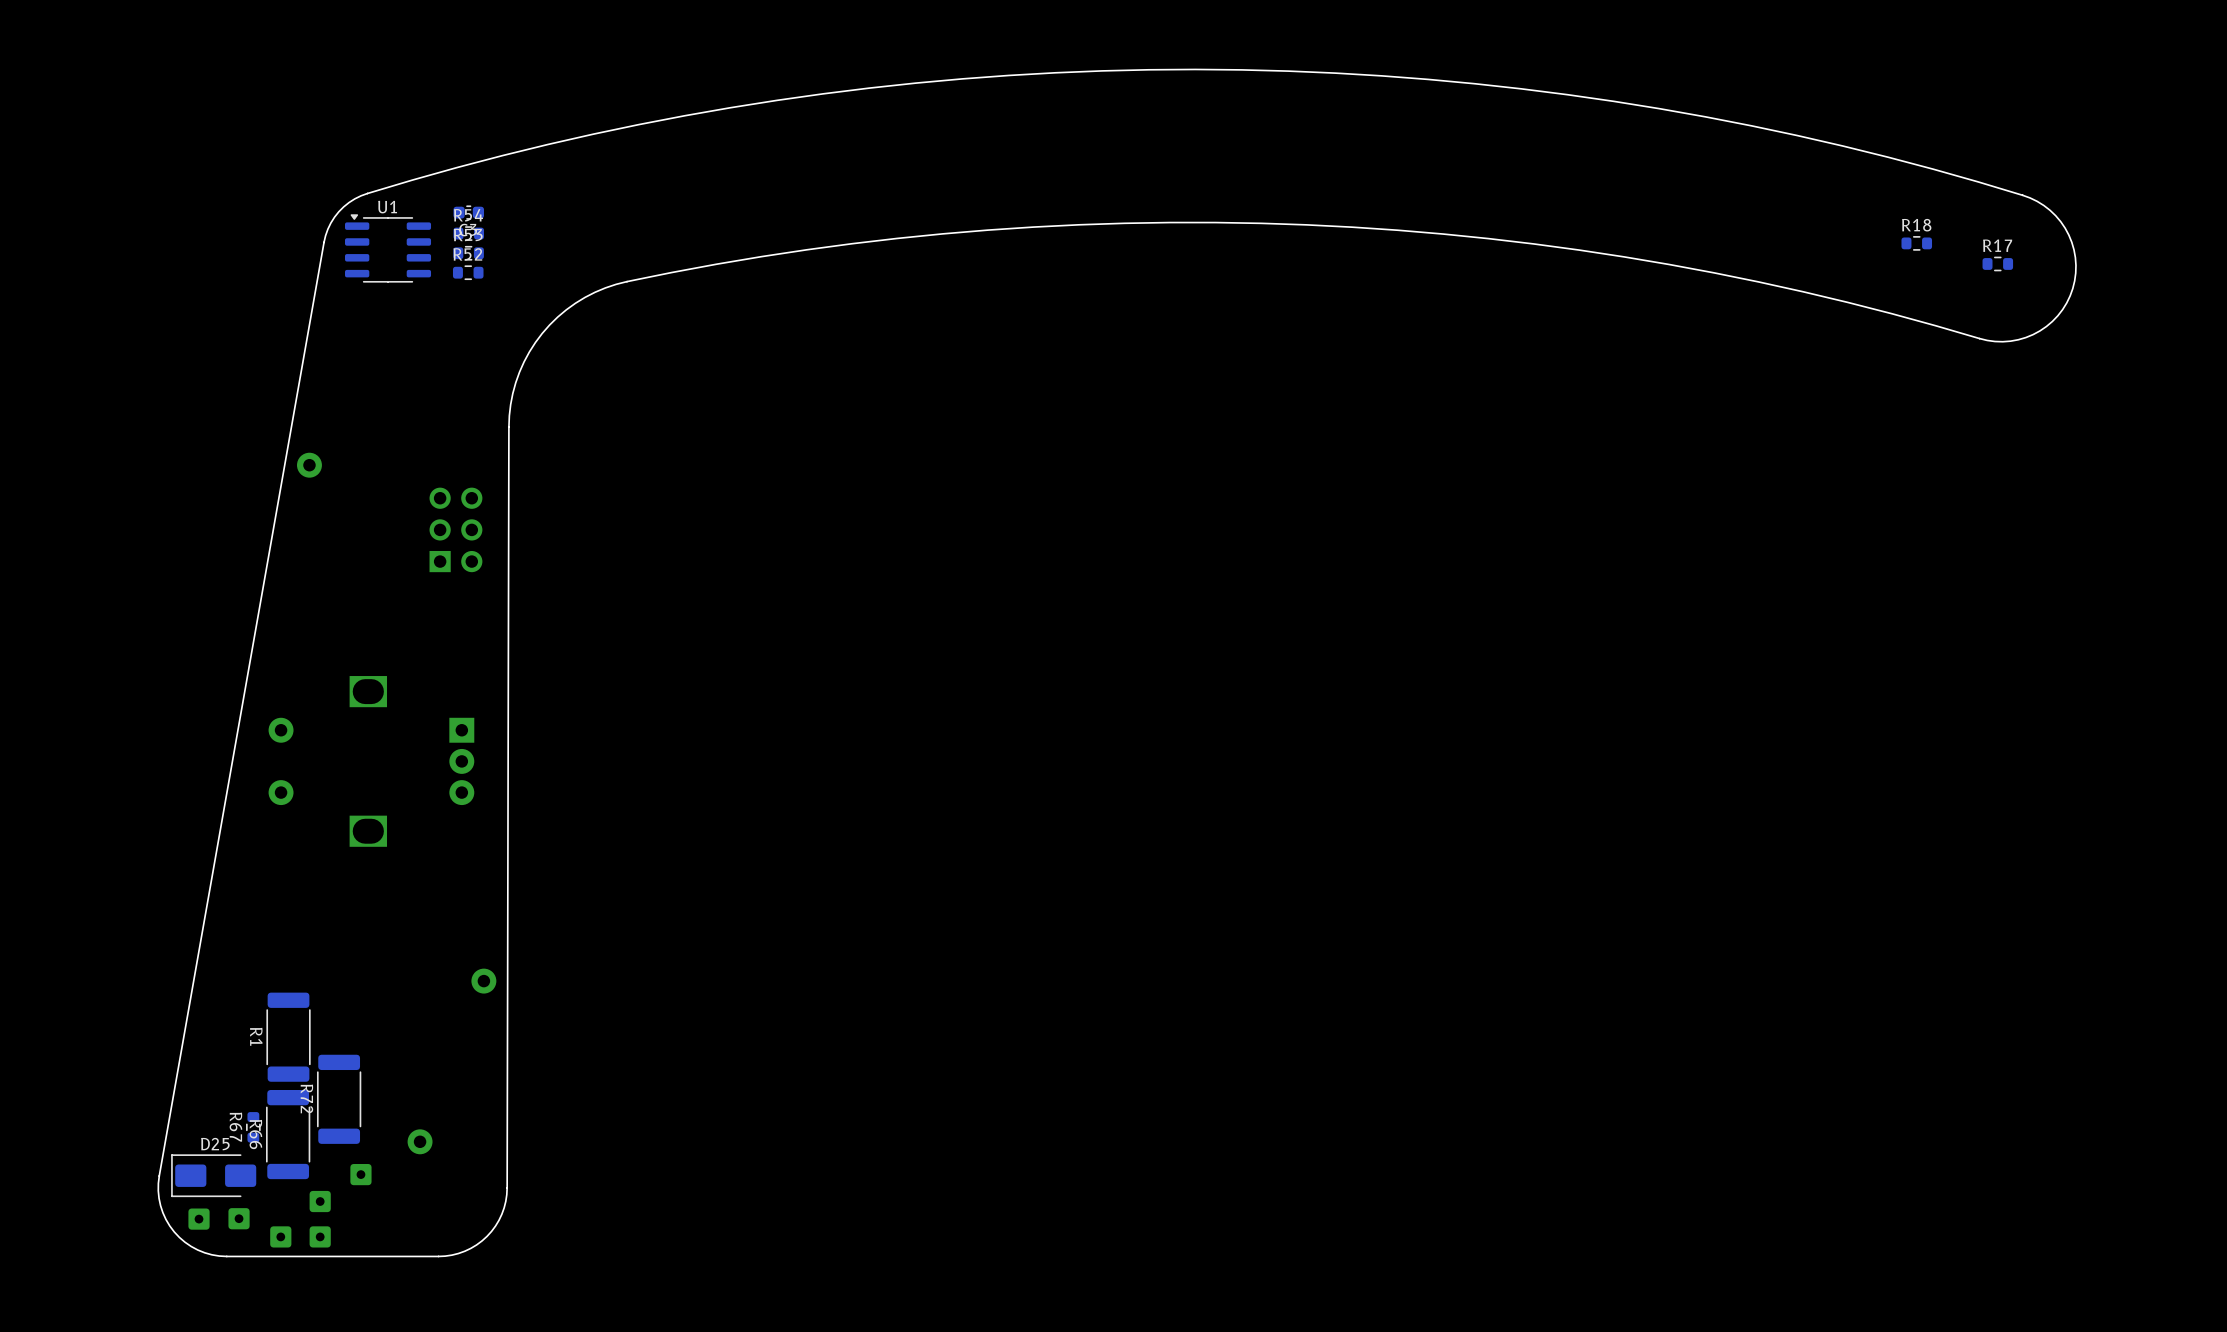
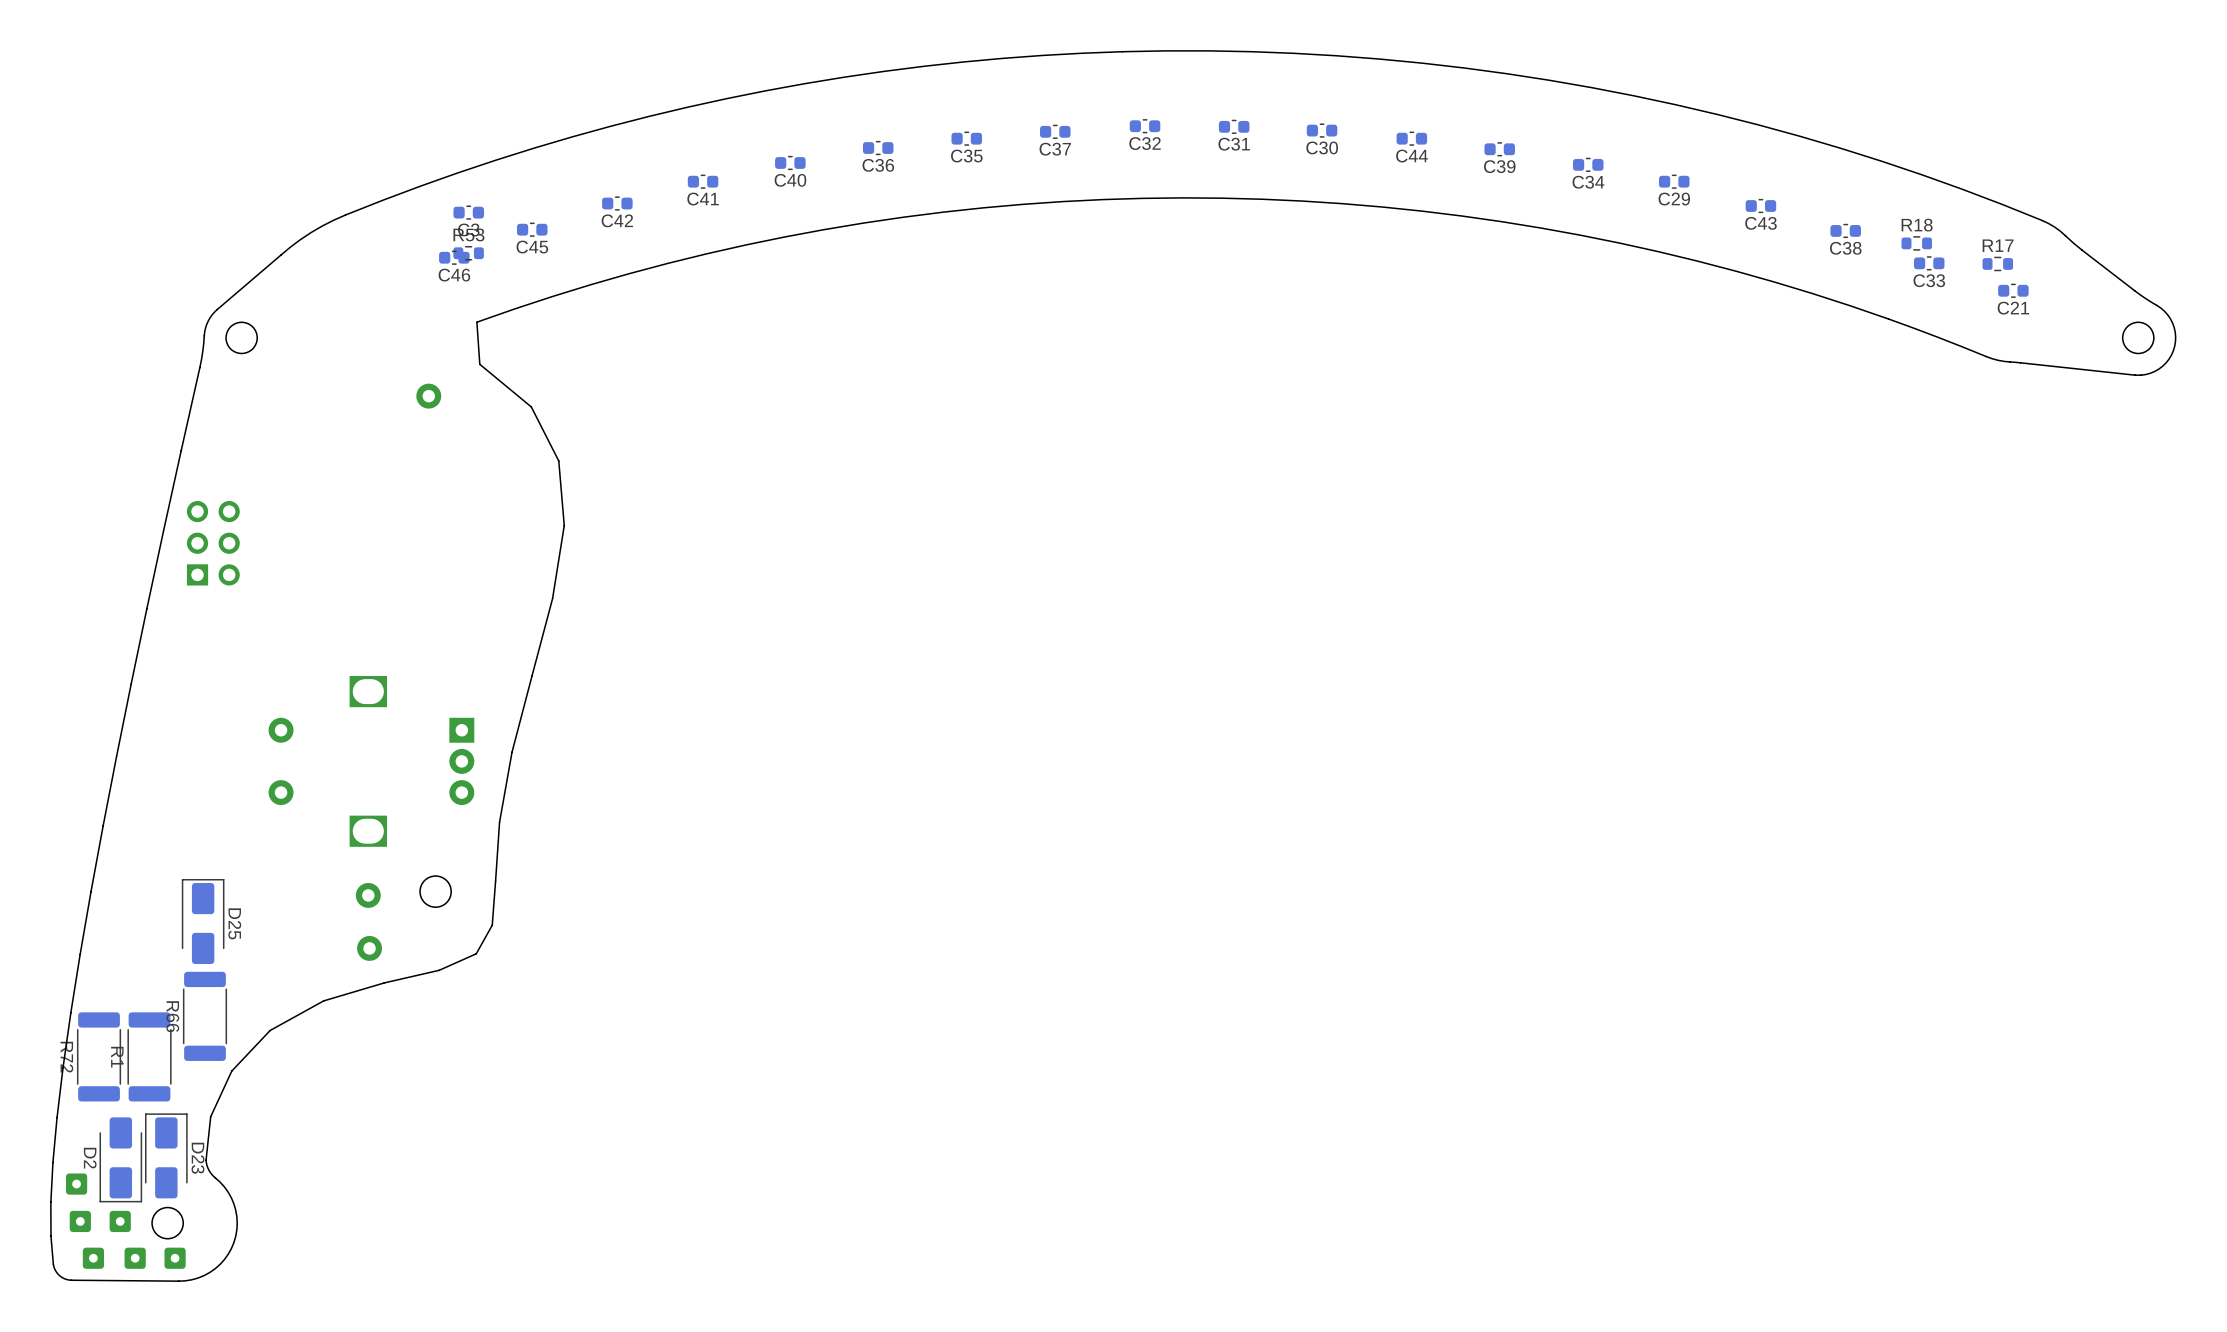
C32: none -> (1145, 126)
C31: none -> (1234, 126)
C30: none -> (1322, 130)
C37: none -> (1055, 131)
C35: none -> (966, 138)
C44: none -> (1411, 138)
C36: none -> (878, 148)
C39: none -> (1499, 149)
C40: none -> (790, 162)
C34: none -> (1588, 164)
C41: none -> (703, 181)
C29: none -> (1674, 181)
board edge: (367, 193) (349, 202) (338, 211) (330, 222) (324, 242) (159, 1175) (158, 1190) (160, 1205) (165, 1219) (174, 1231) (191, 1246) (204, 1252) (219, 1256) (445, 1256) (464, 1251) (482, 1240) (491, 1231) (501, 1214) (507, 1188) (509, 415) (512, 393) (519, 372) (535, 342) (557, 317) (585, 297) (616, 284) (671, 272) (761, 256) (897, 238) (987, 230) (1078, 224) (1170, 222) (1261, 223) (1352, 227) (1443, 234) (1534, 243) (1624, 256) (1714, 272) (1803, 291) (1891, 313) (1979, 338) (2002, 341) (2025, 337) (2039, 330) (2052, 321) (2062, 309) (2070, 295) (2075, 273) (2075, 257) (2068, 235) (2060, 221) (2043, 205) (2022, 195) (1933, 169) (1797, 135) (1659, 108) (1521, 88) (1428, 79) (1335, 73) (1241, 69) (1101, 70) (962, 78) (869, 88) (730, 107) (638, 124) (502, 155) (367, 193) -> (1122, 51) (1208, 50) (1293, 53) (1379, 59) (1464, 68) (1549, 80) (1633, 95) (1716, 114) (1799, 136) (1922, 174) (2048, 223) (2134, 290) (2164, 311) (2174, 327) (2174, 346) (2169, 359) (2162, 366) (2154, 371) (2141, 375) (2004, 361) (1812, 293) (1735, 271) (1619, 243) (1501, 221) (1421, 211) (1342, 203) (1222, 198) (1102, 199) (1022, 204) (943, 212) (824, 229) (745, 244) (629, 273) (552, 296) (476, 322) (479, 364) (531, 406) (558, 461) (564, 525) (552, 598) (512, 752) (499, 822) (492, 925) (476, 953) (439, 970) (384, 982) (323, 1000) (270, 1030) (231, 1071) (210, 1116) (206, 1160) (210, 1172) (224, 1187) (231, 1198) (235, 1210) (236, 1229) (228, 1254) (215, 1268) (198, 1278) (178, 1281) (71, 1280) (59, 1275) (53, 1266) (50, 1236) (52, 1162) (63, 1067) (80, 954) (116, 756) (199, 367) (205, 328) (214, 312) (290, 247) (333, 220) (457, 173) (571, 137) (687, 107) (844, 77) (1002, 58) (1122, 51)
C42: none -> (617, 203)
C43: none -> (1760, 206)
C45: none -> (532, 229)
C38: none -> (1845, 230)
R54: (468, 233) -> none
U1: (388, 248) -> none
C46: none -> (454, 257)
C33: none -> (1929, 263)
R52: (468, 272) -> none
C21: none -> (2013, 290)
round board edge: none -> [225, 321, 258, 355]
round board edge: none -> [2122, 321, 2155, 355]
part position: (309, 465) -> (428, 396)
part position: (455, 529) -> (213, 543)
round board edge: none -> [419, 875, 452, 908]
part: none -> (368, 895)
part: none -> (369, 948)
part: (483, 981) -> none
R1 position: (288, 1037) -> (149, 1056)
R72 position: (339, 1099) -> (99, 1056)
R67: (253, 1127) -> none
R66 position: (288, 1134) -> (204, 1016)
part: (420, 1141) -> none
D23: none -> (166, 1155)
D2: none -> (120, 1159)
part: (360, 1174) -> none
D25 rotation: 0° (213, 1175) -> 90° clockwise (203, 921)
D25 position: (213, 1175) -> (203, 921)
part: none -> (76, 1184)
part: (320, 1201) -> none
round board edge: none -> [151, 1206, 184, 1240]
part: (239, 1218) -> none
part: (199, 1219) -> none
part: none -> (80, 1221)
part: none -> (120, 1221)
part: (280, 1236) -> none
part: (320, 1236) -> none
part: none -> (93, 1258)
part: none -> (135, 1258)
part: none -> (175, 1258)

